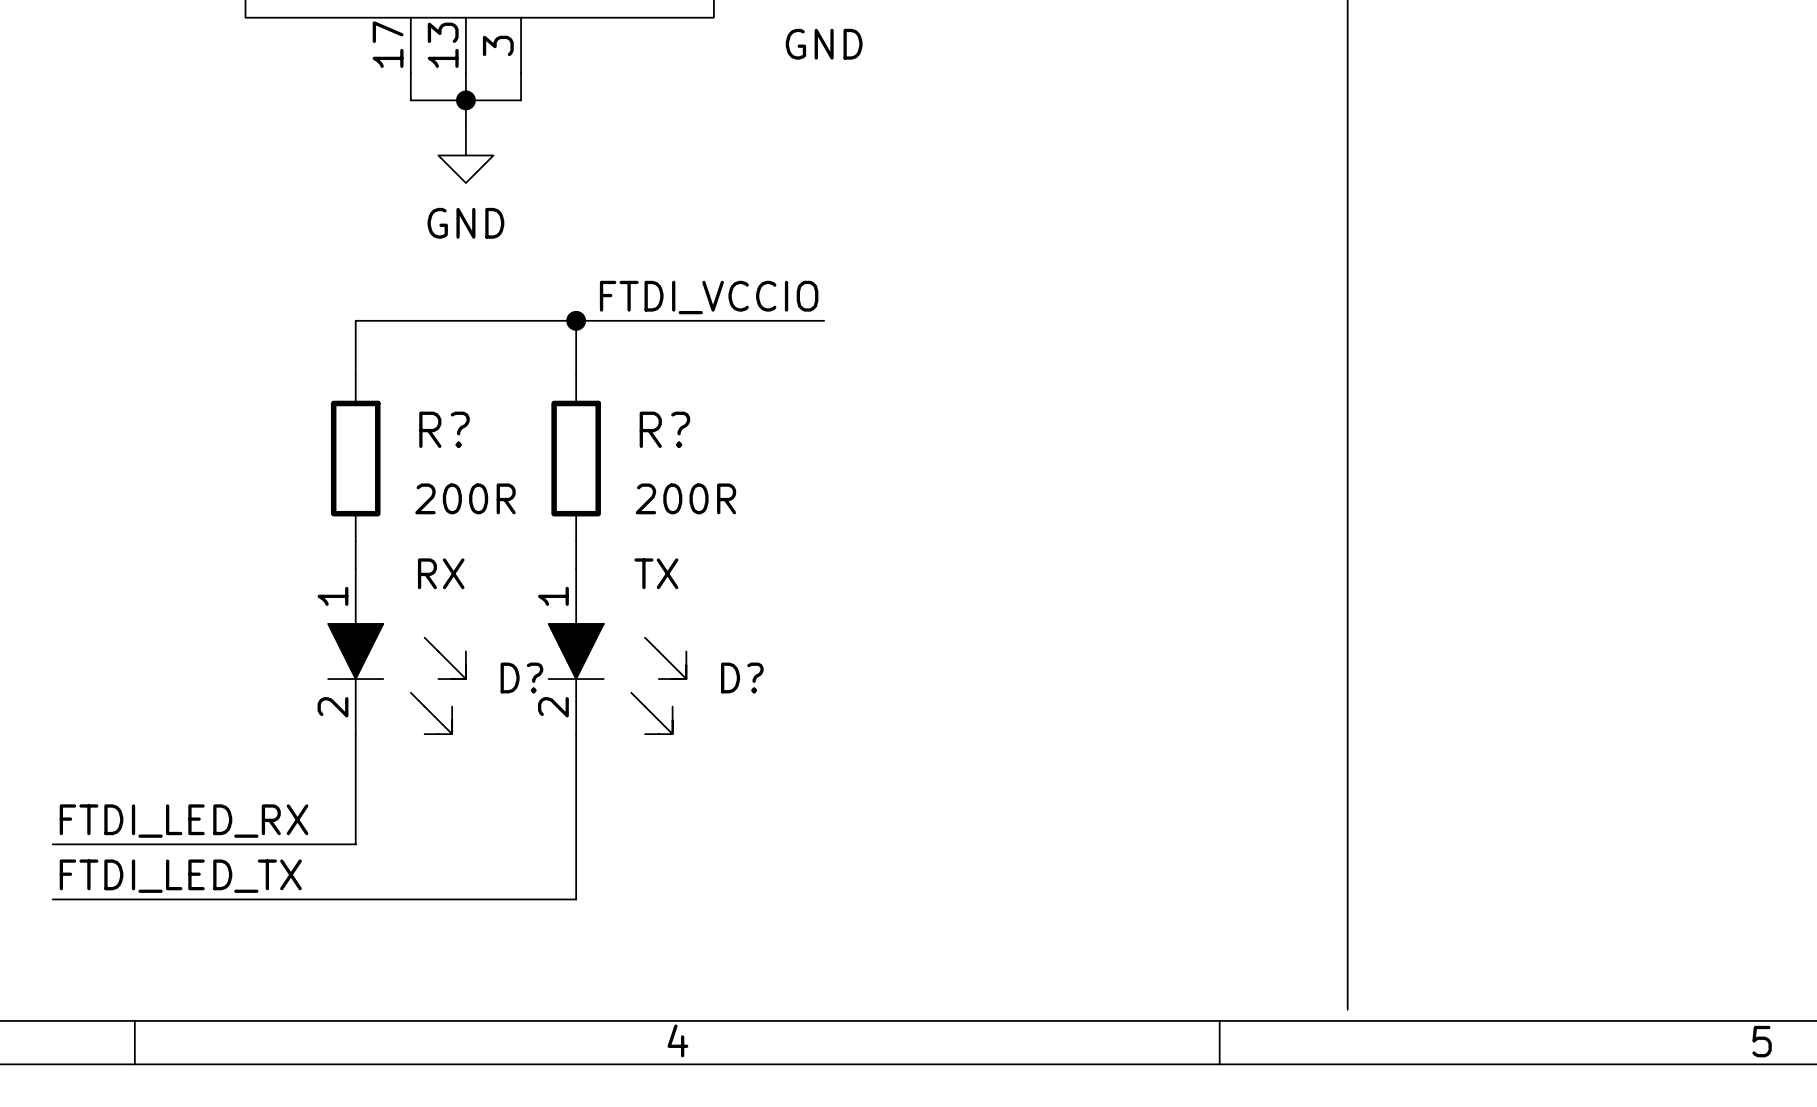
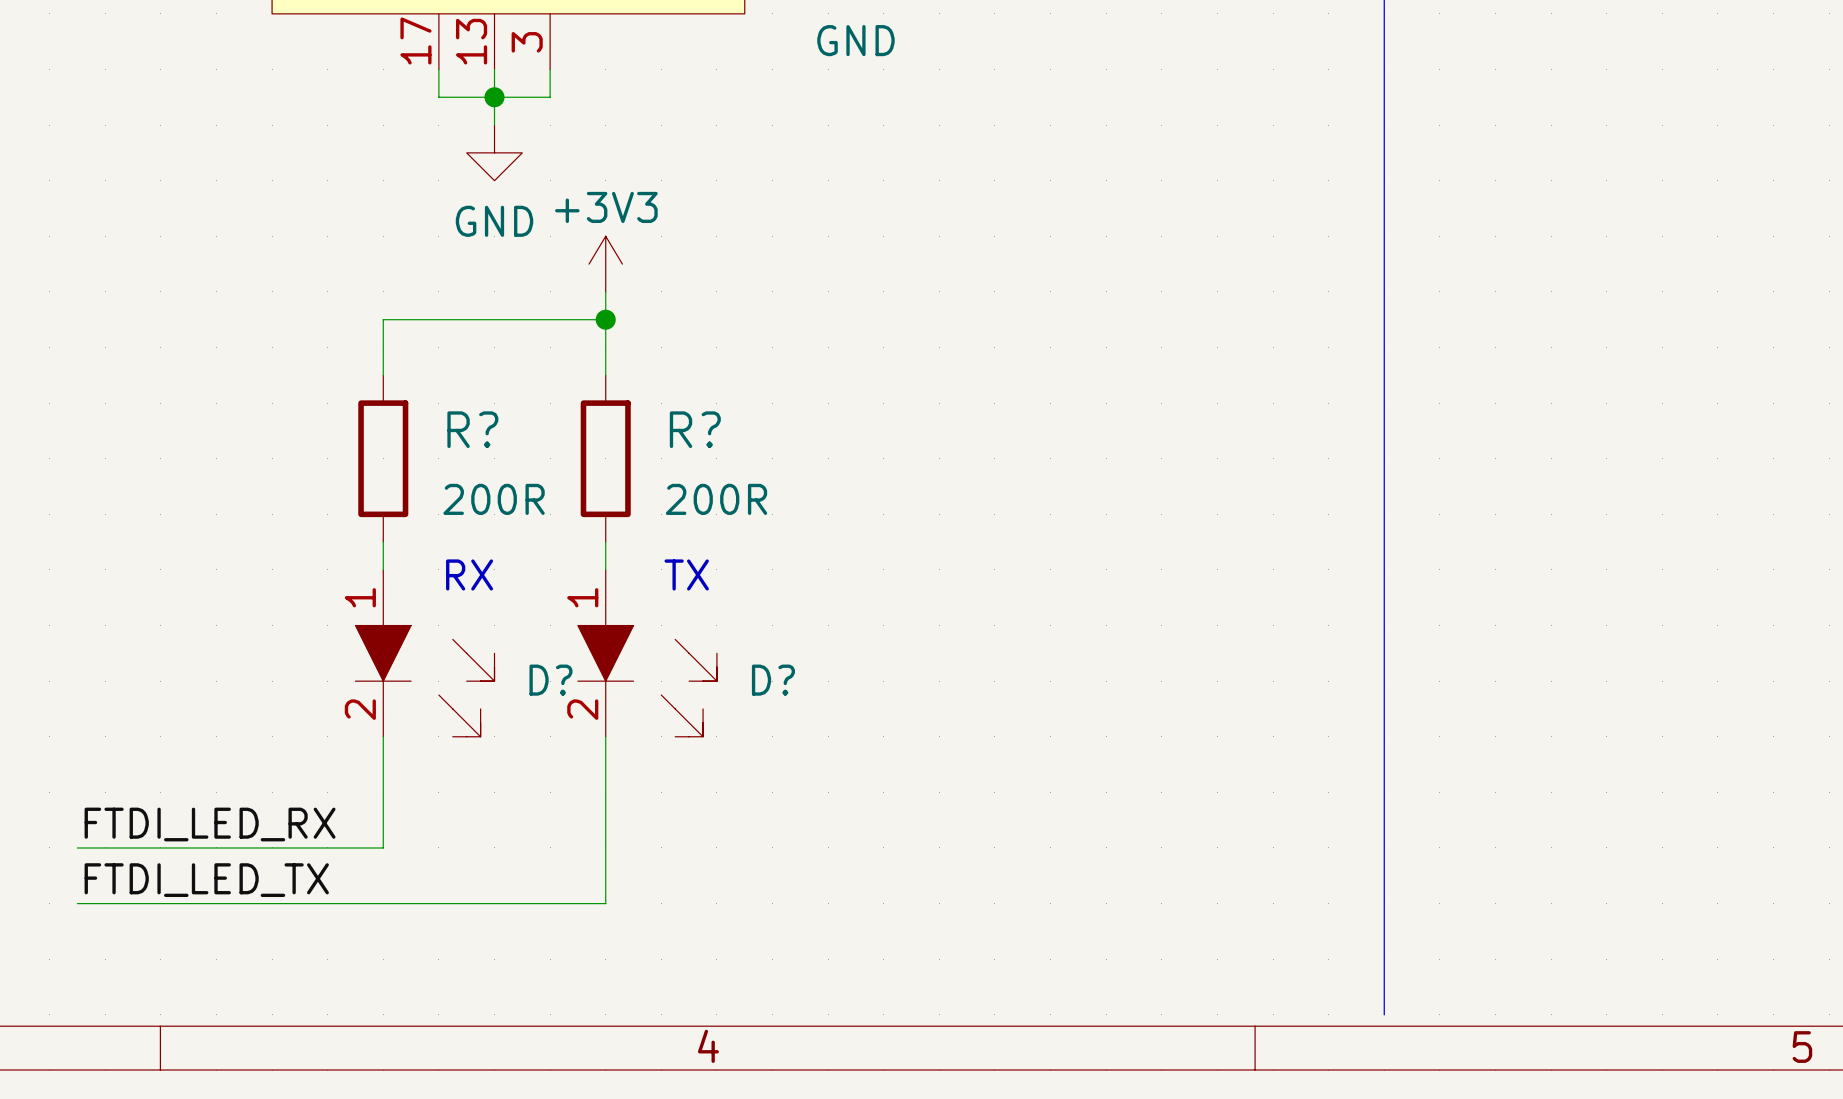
power symbol: none -> +3V3 (605, 264)
label: FTDI_VCCIO (709, 297) -> none
wire: (576, 320) (824, 320) -> (605, 319) (605, 291)

